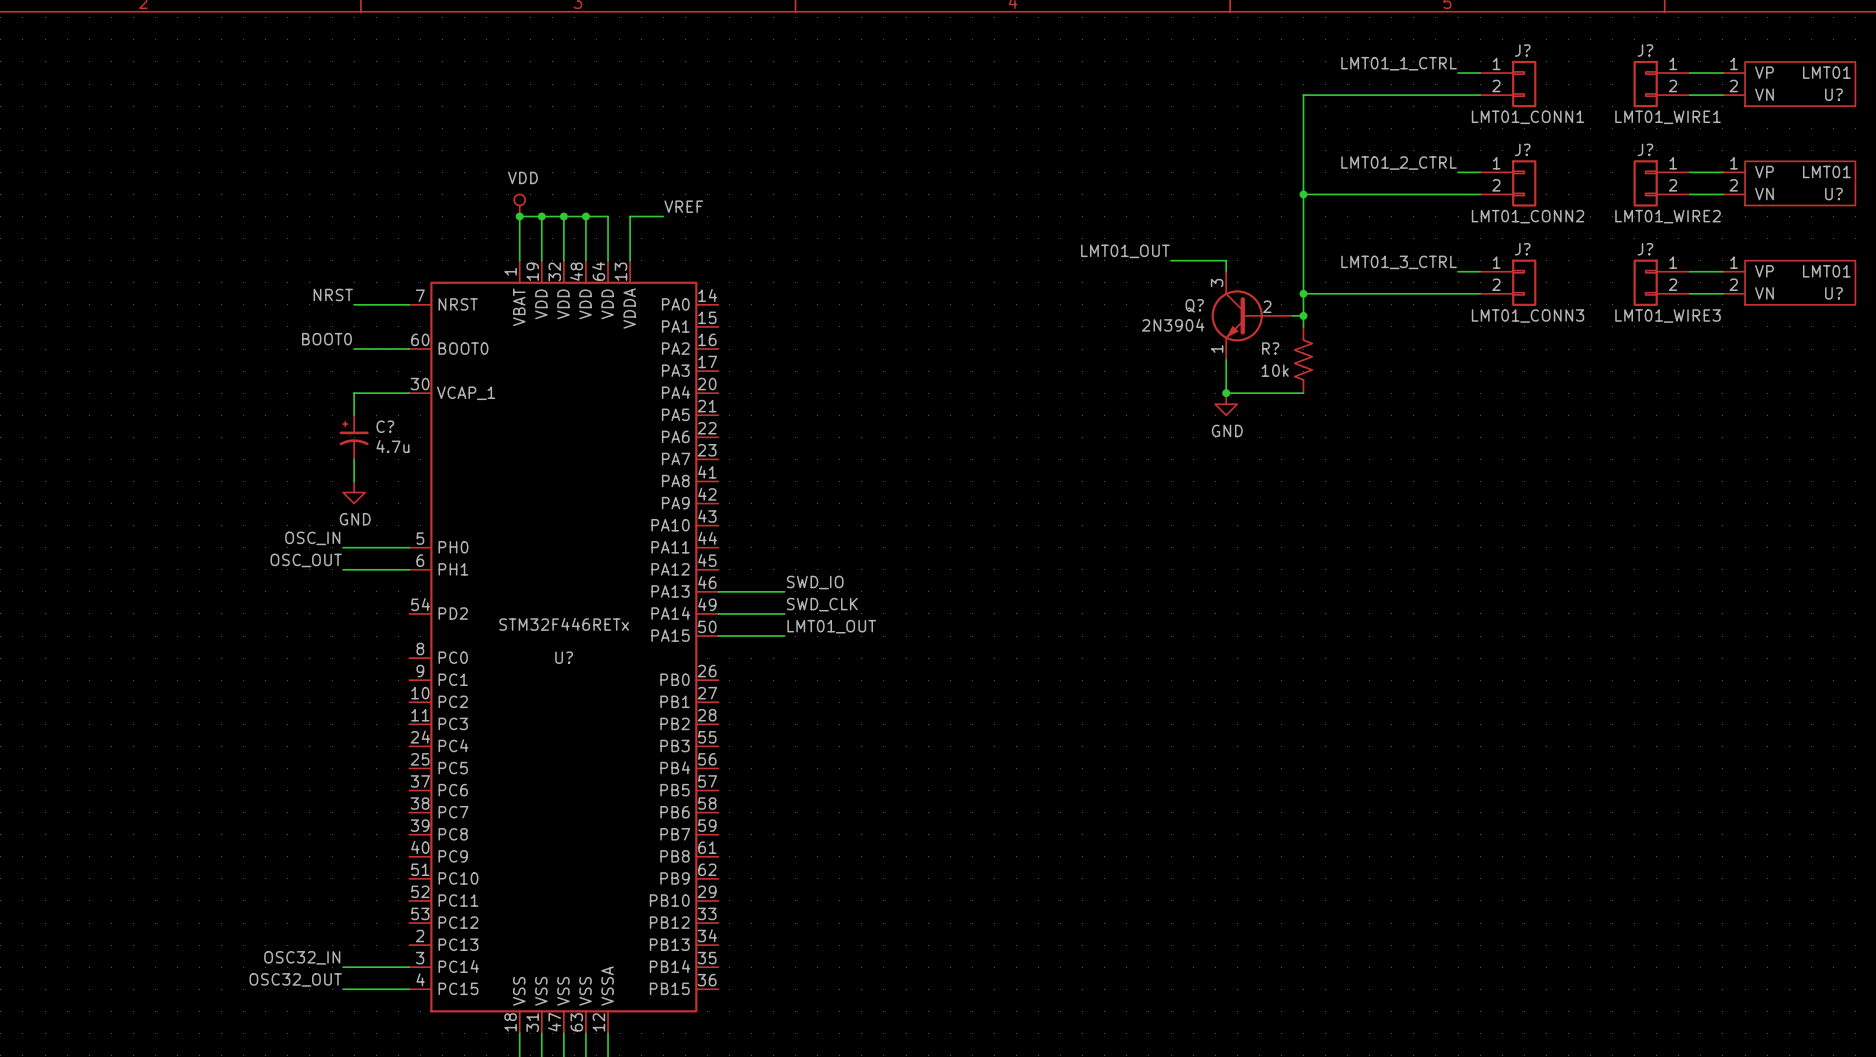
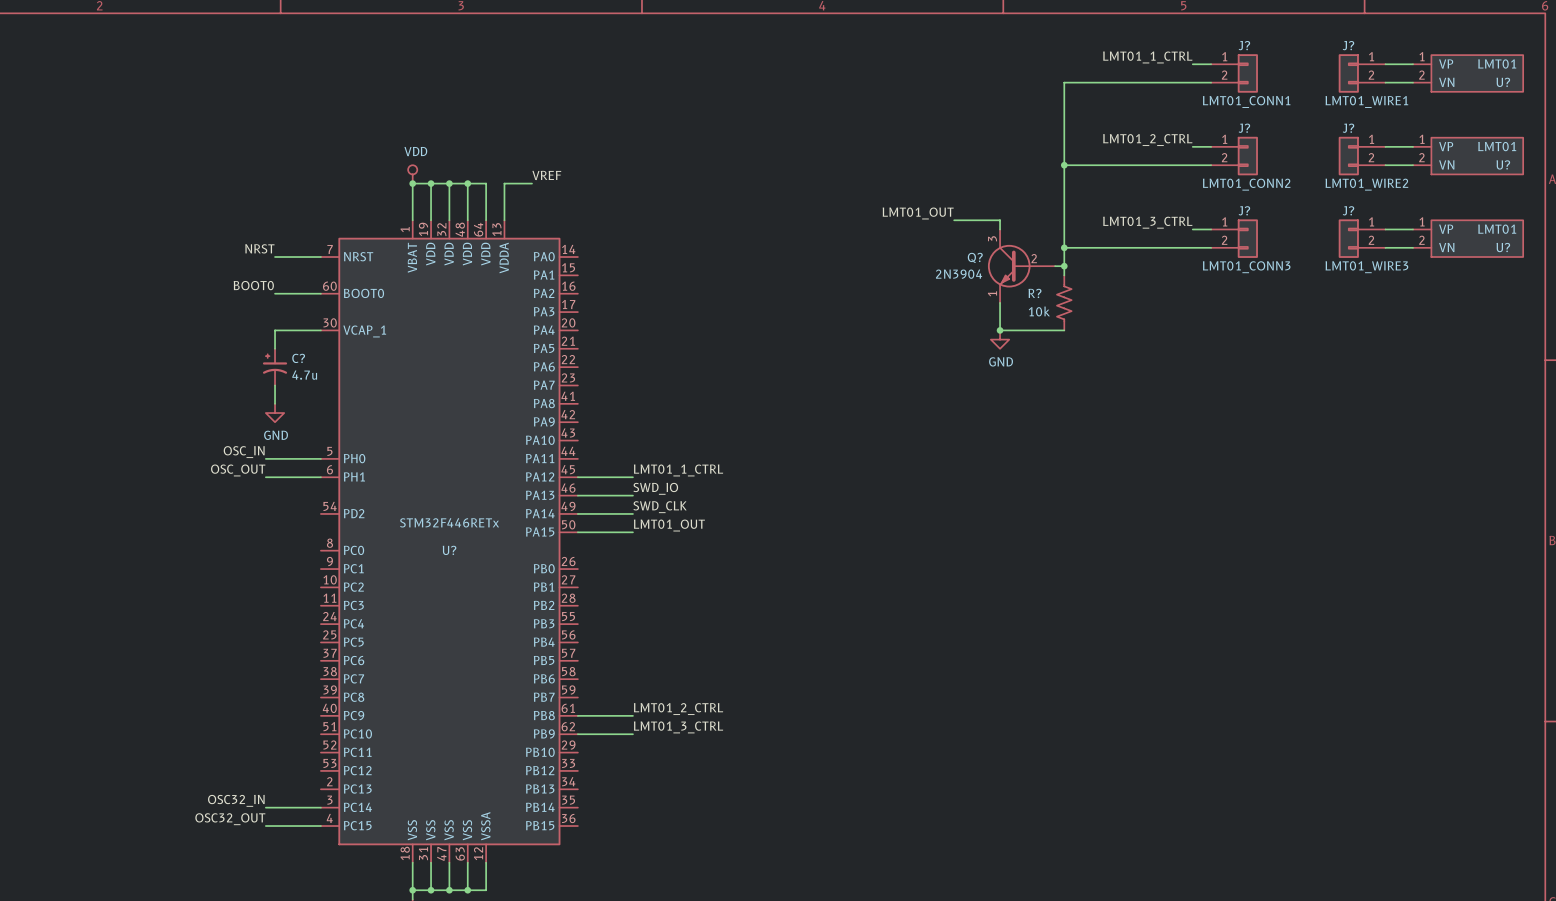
label: none -> LMT01_1_CTRL (678, 470)
wire: none -> (577, 477) (632, 477)
label: none -> LMT01_2_CTRL (678, 709)
wire: none -> (577, 715) (632, 715)
label: none -> LMT01_3_CTRL (678, 727)
wire: none -> (577, 734) (632, 734)

